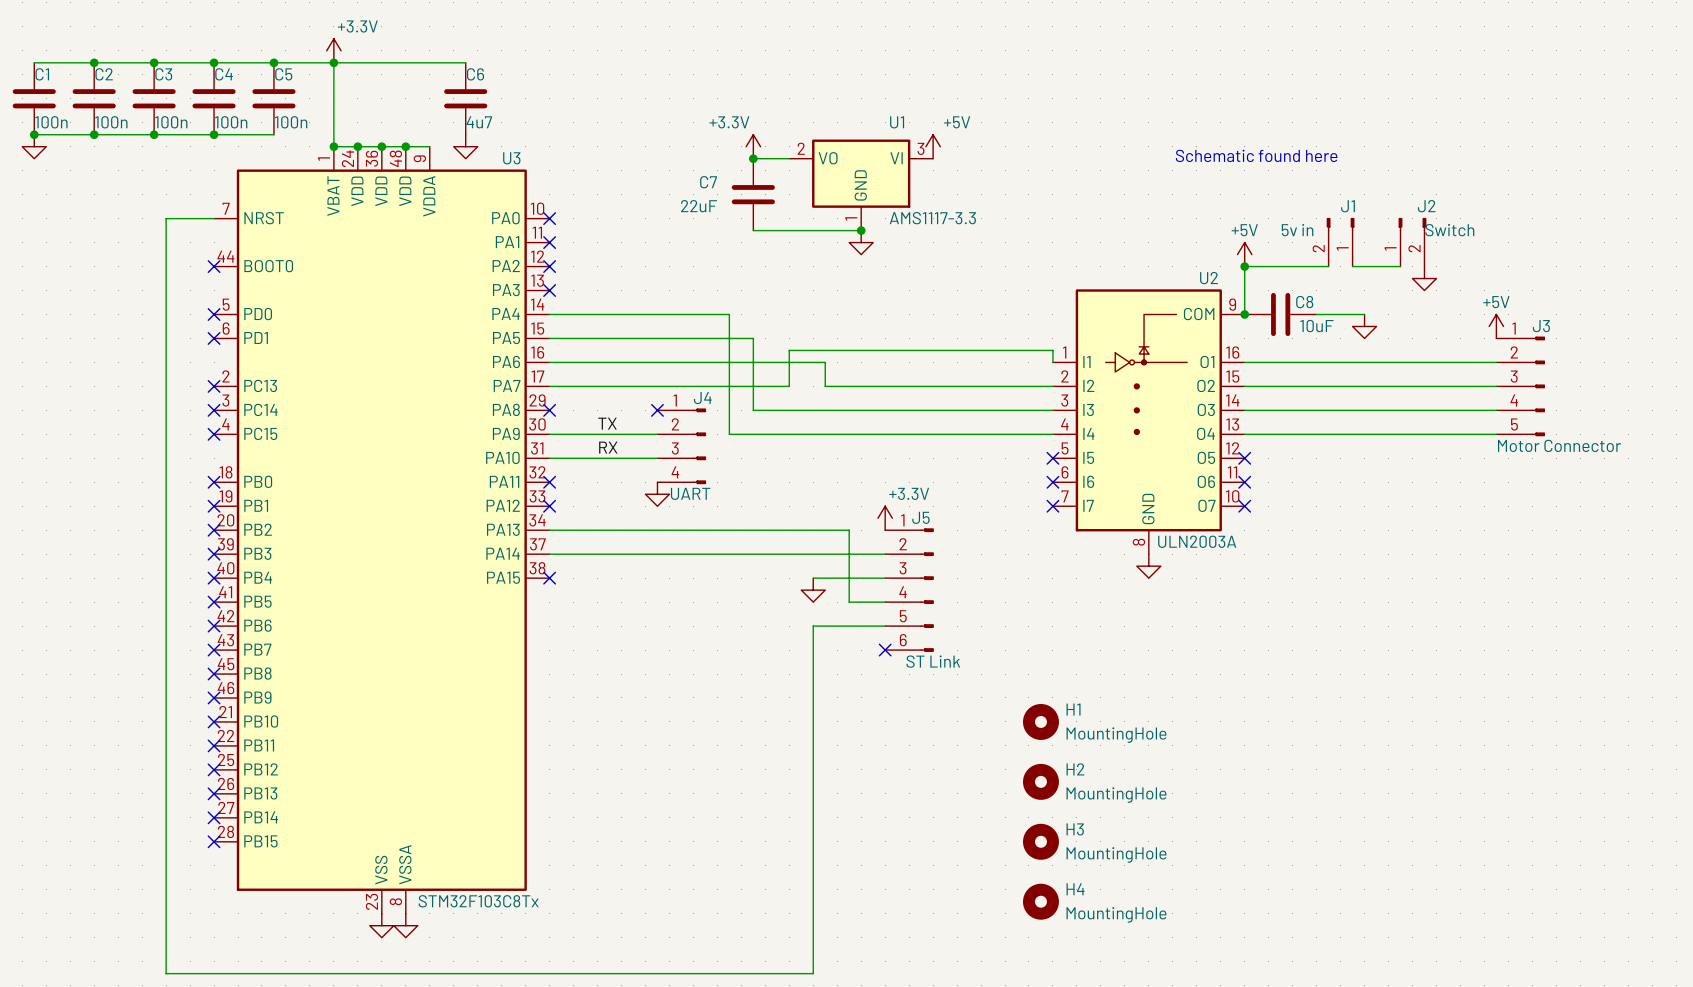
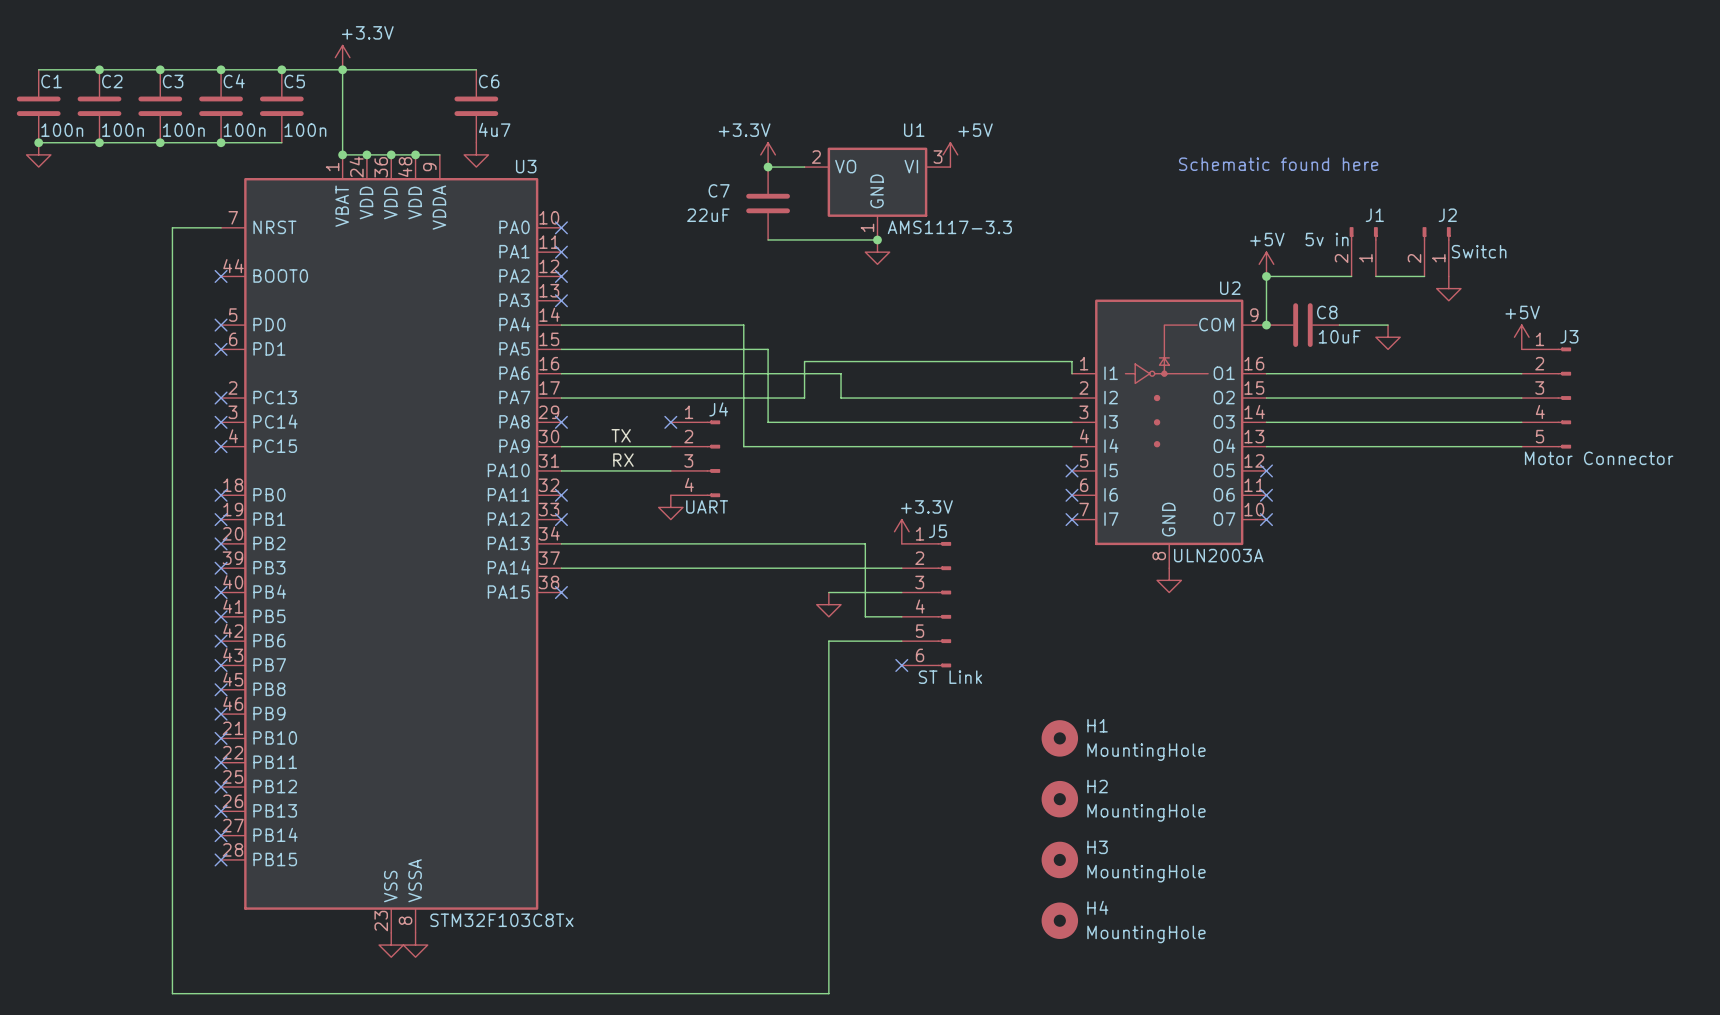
J2 flip: as is (1412, 224) -> left-right (1436, 233)
J2 value position: Switch (1449, 230) -> Switch (1479, 251)

